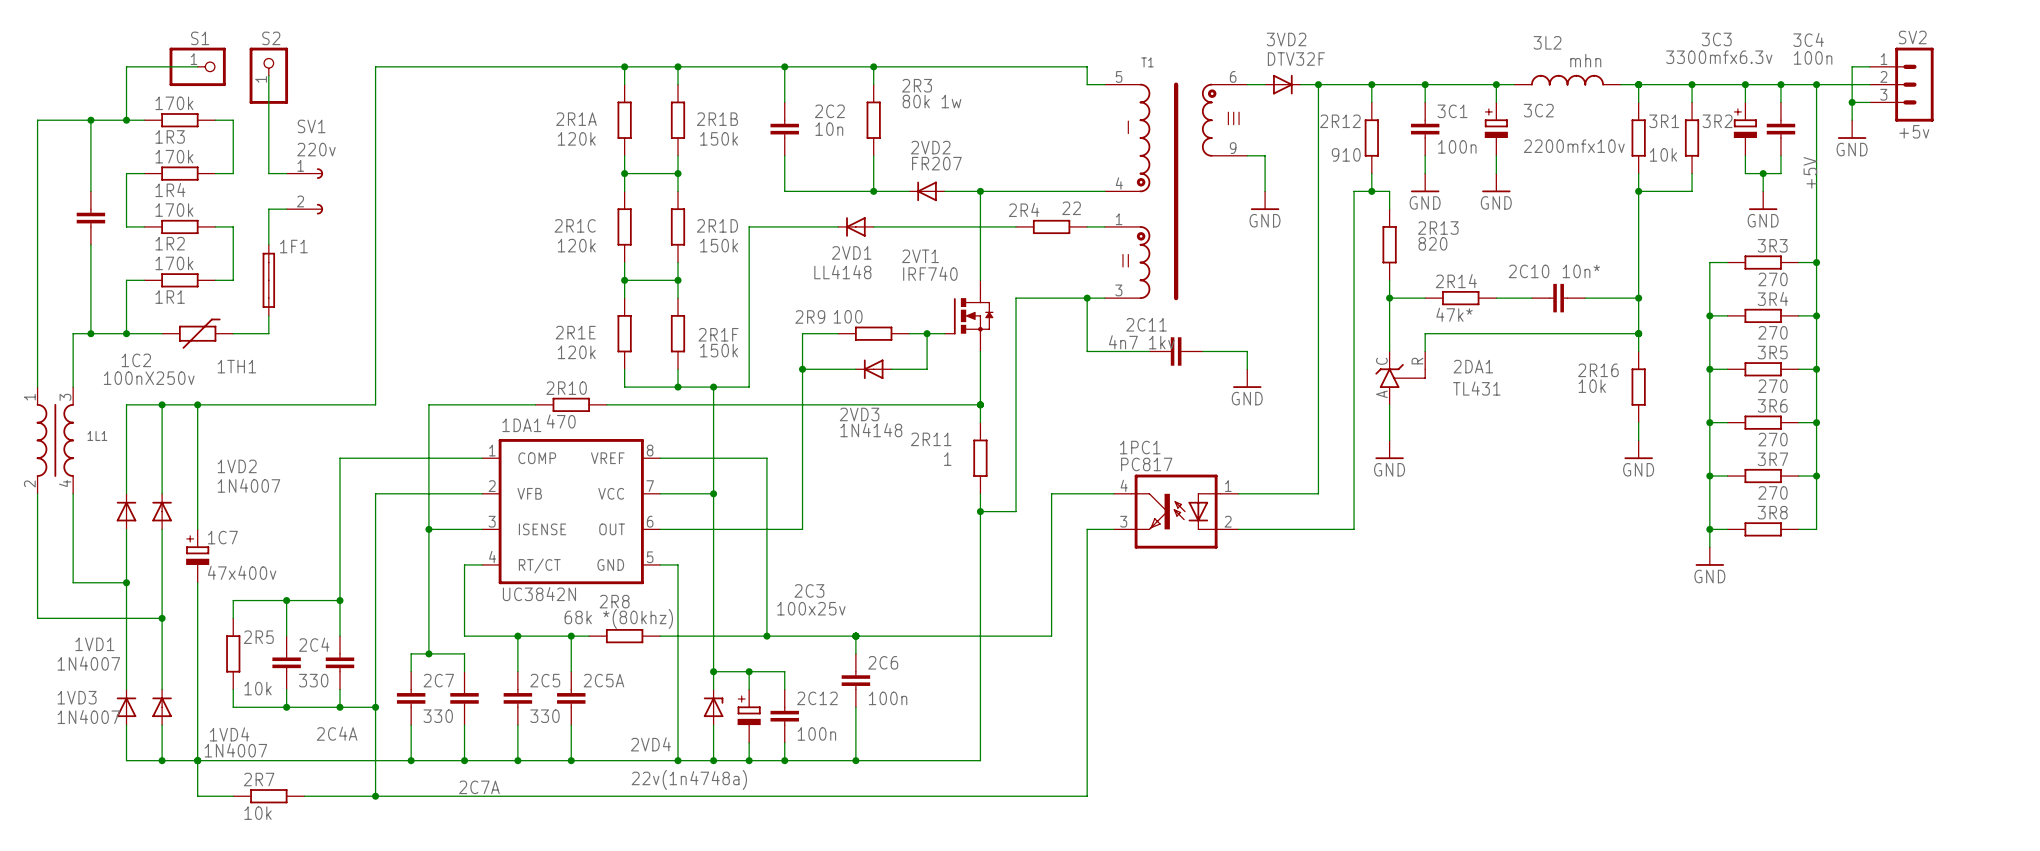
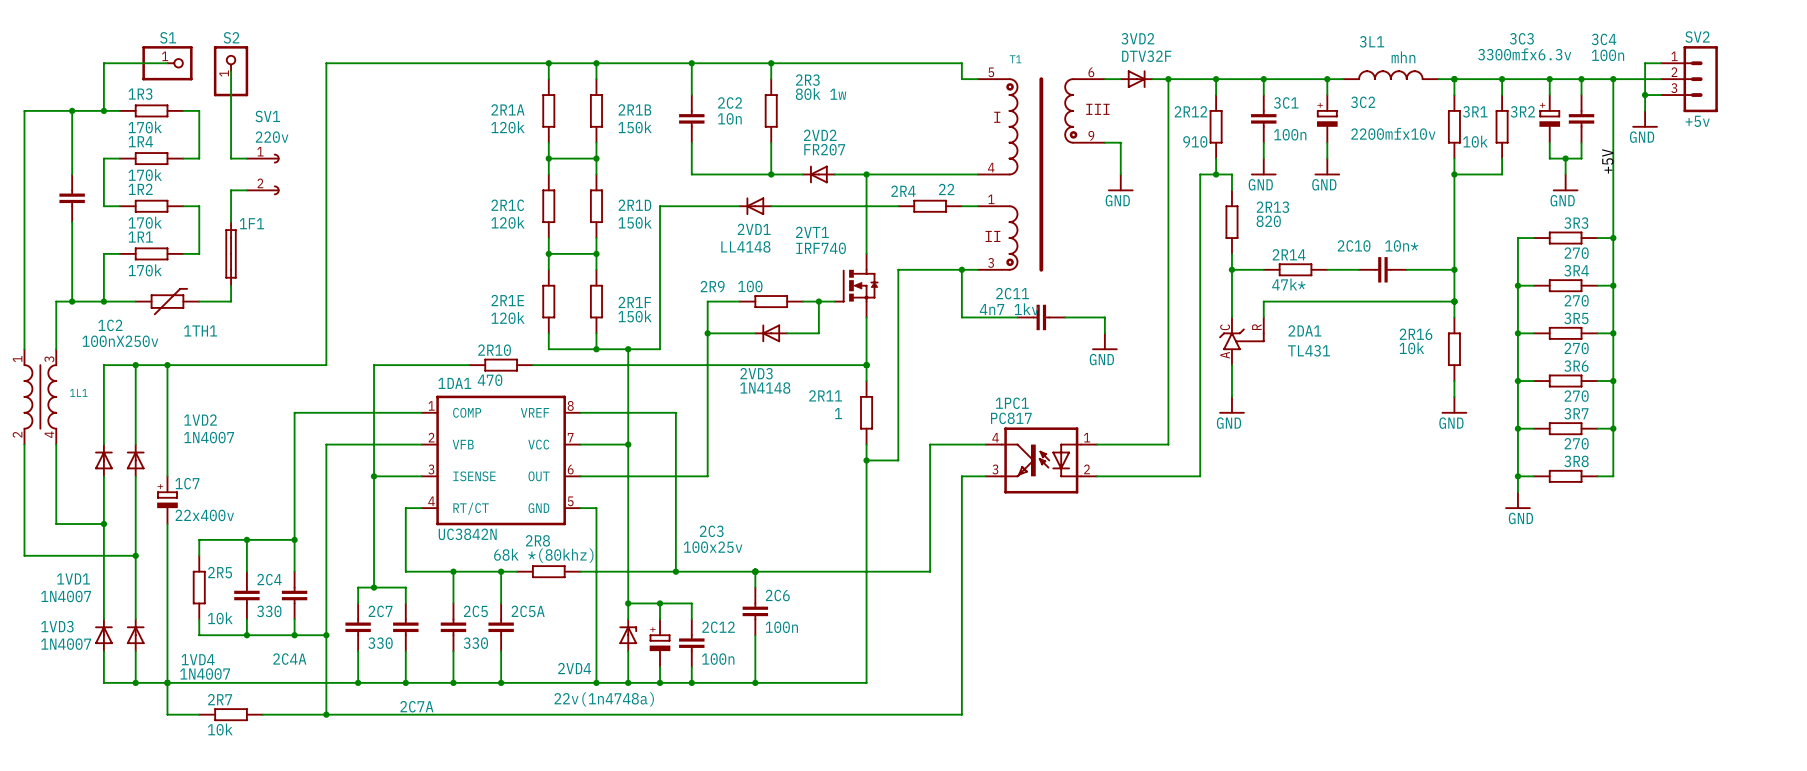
3L2 name: 3L2 (1547, 42) -> 3L1 (1372, 41)
T1 symbol: [1104, 82, 1248, 301] -> [977, 77, 1105, 272]
1R3 value position: 170k (174, 103) -> 170k (145, 127)
1R3 name position: 1R3 (170, 136) -> 1R3 (140, 94)
1R4 value position: 170k (174, 156) -> 170k (145, 175)
1R4 name position: 1R4 (170, 190) -> 1R4 (140, 141)
1R2 value position: 170k (174, 210) -> 170k (145, 222)
1R2 name position: 1R2 (170, 243) -> 1R2 (140, 189)
1R1 value position: 170k (174, 263) -> 170k (145, 270)
1R1 name position: 1R1 (170, 297) -> 1R1 (140, 237)
1C7 value: 47x400v (242, 572) -> 22x400v (204, 515)

